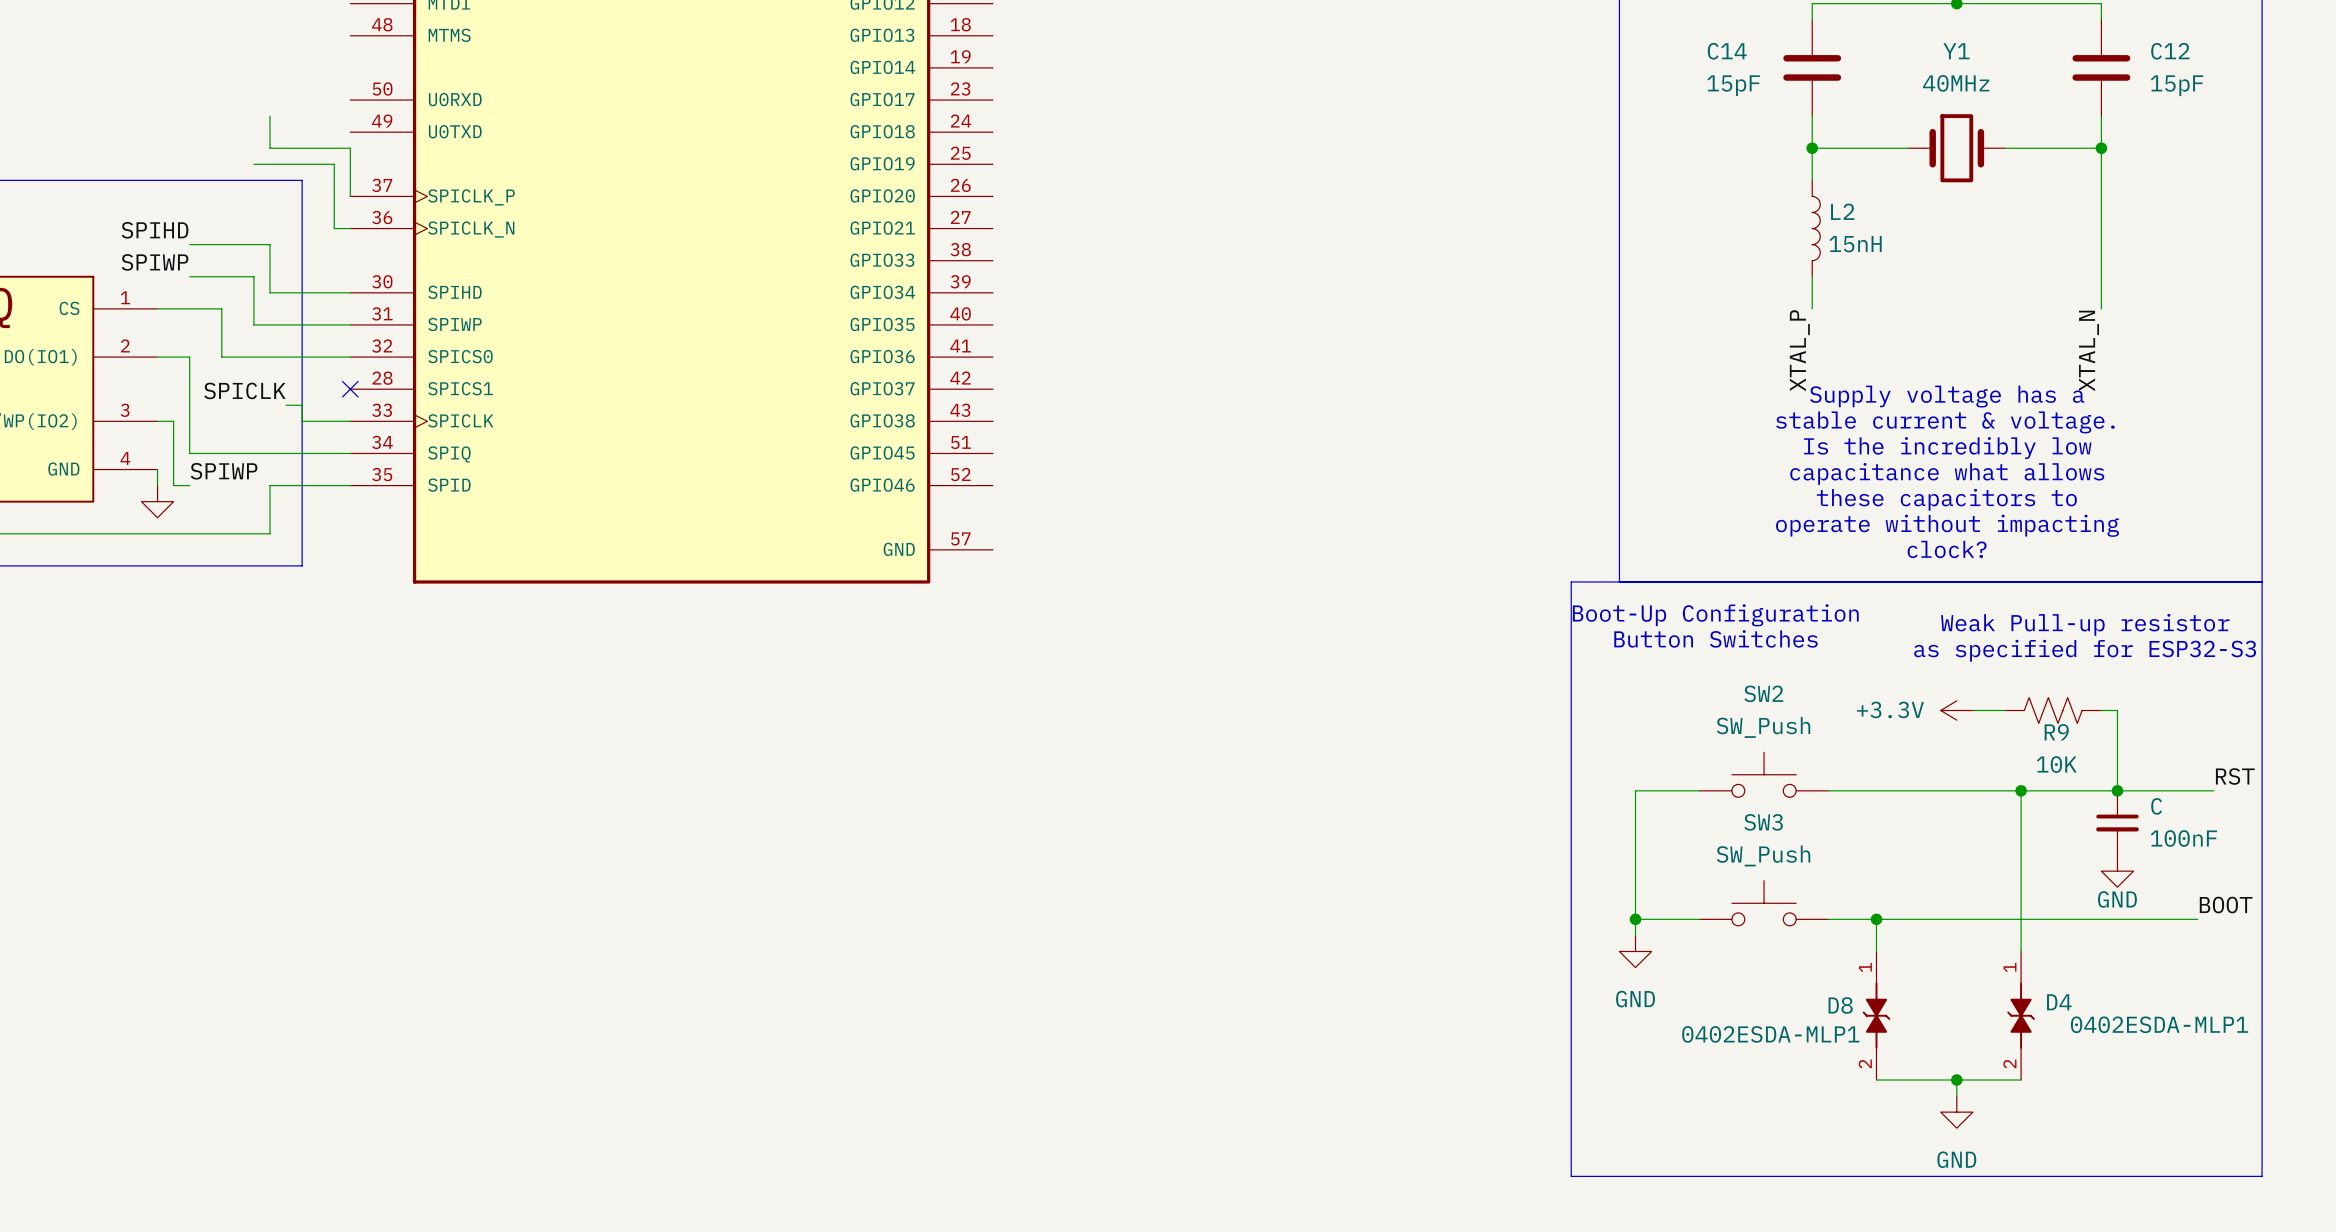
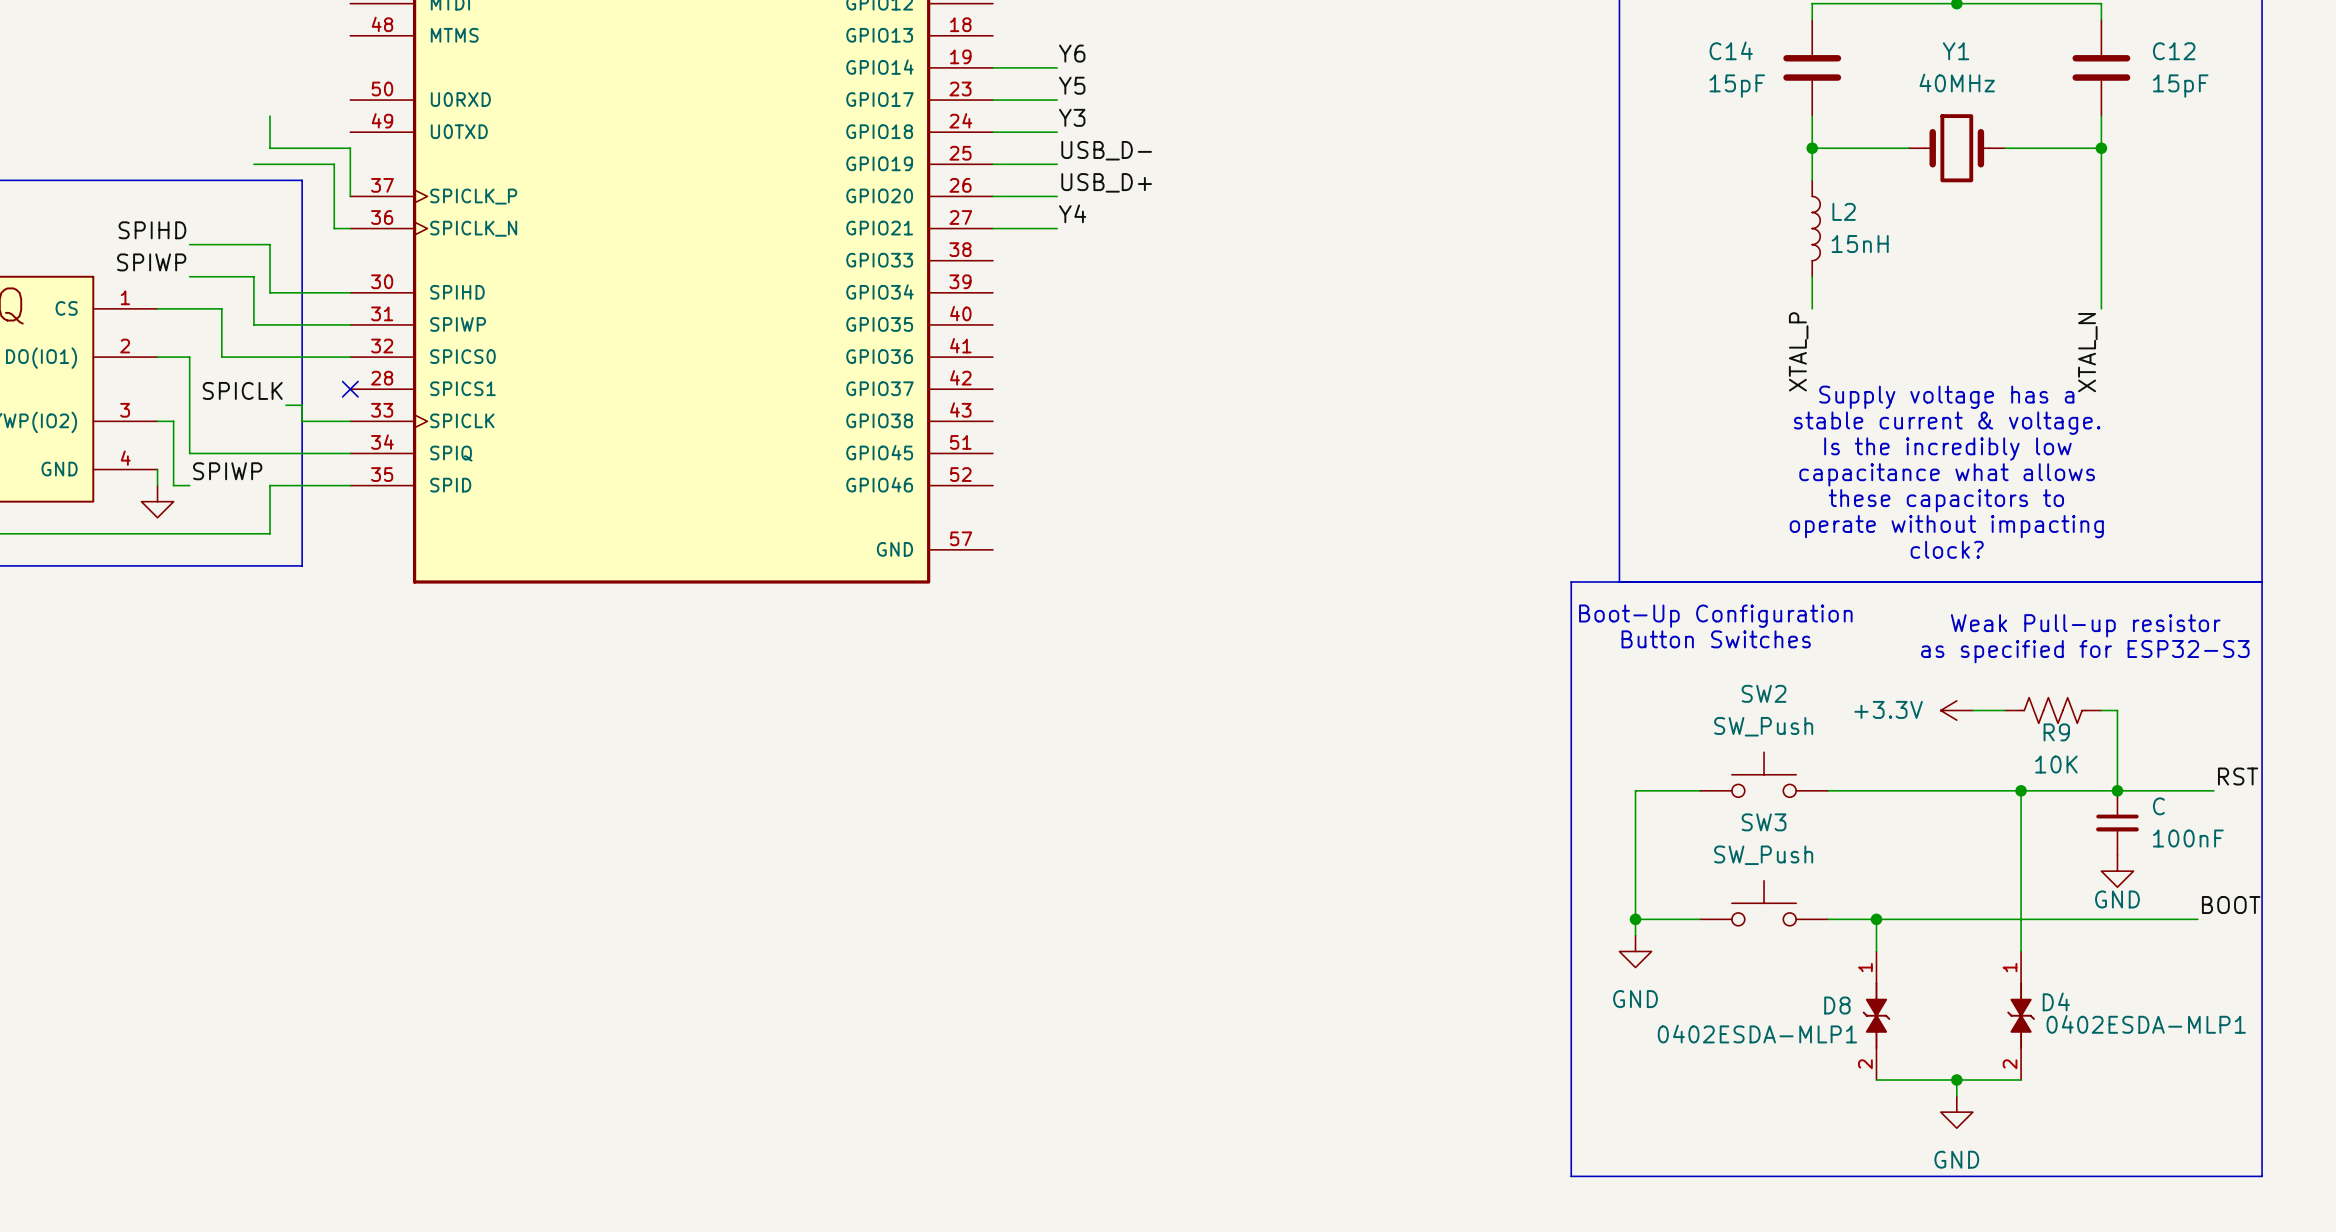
label: none -> Y6 (1072, 53)
wire: none -> (992, 67) (1057, 67)
label: none -> Y5 (1072, 85)
wire: none -> (992, 100) (1057, 100)
label: none -> Y3 (1072, 117)
wire: none -> (992, 132) (1057, 132)
label: none -> USB_D- (1106, 150)
wire: none -> (992, 164) (1057, 164)
label: none -> USB_D+ (1106, 182)
wire: none -> (992, 196) (1057, 196)
label: none -> Y4 (1072, 213)
wire: none -> (992, 228) (1057, 228)

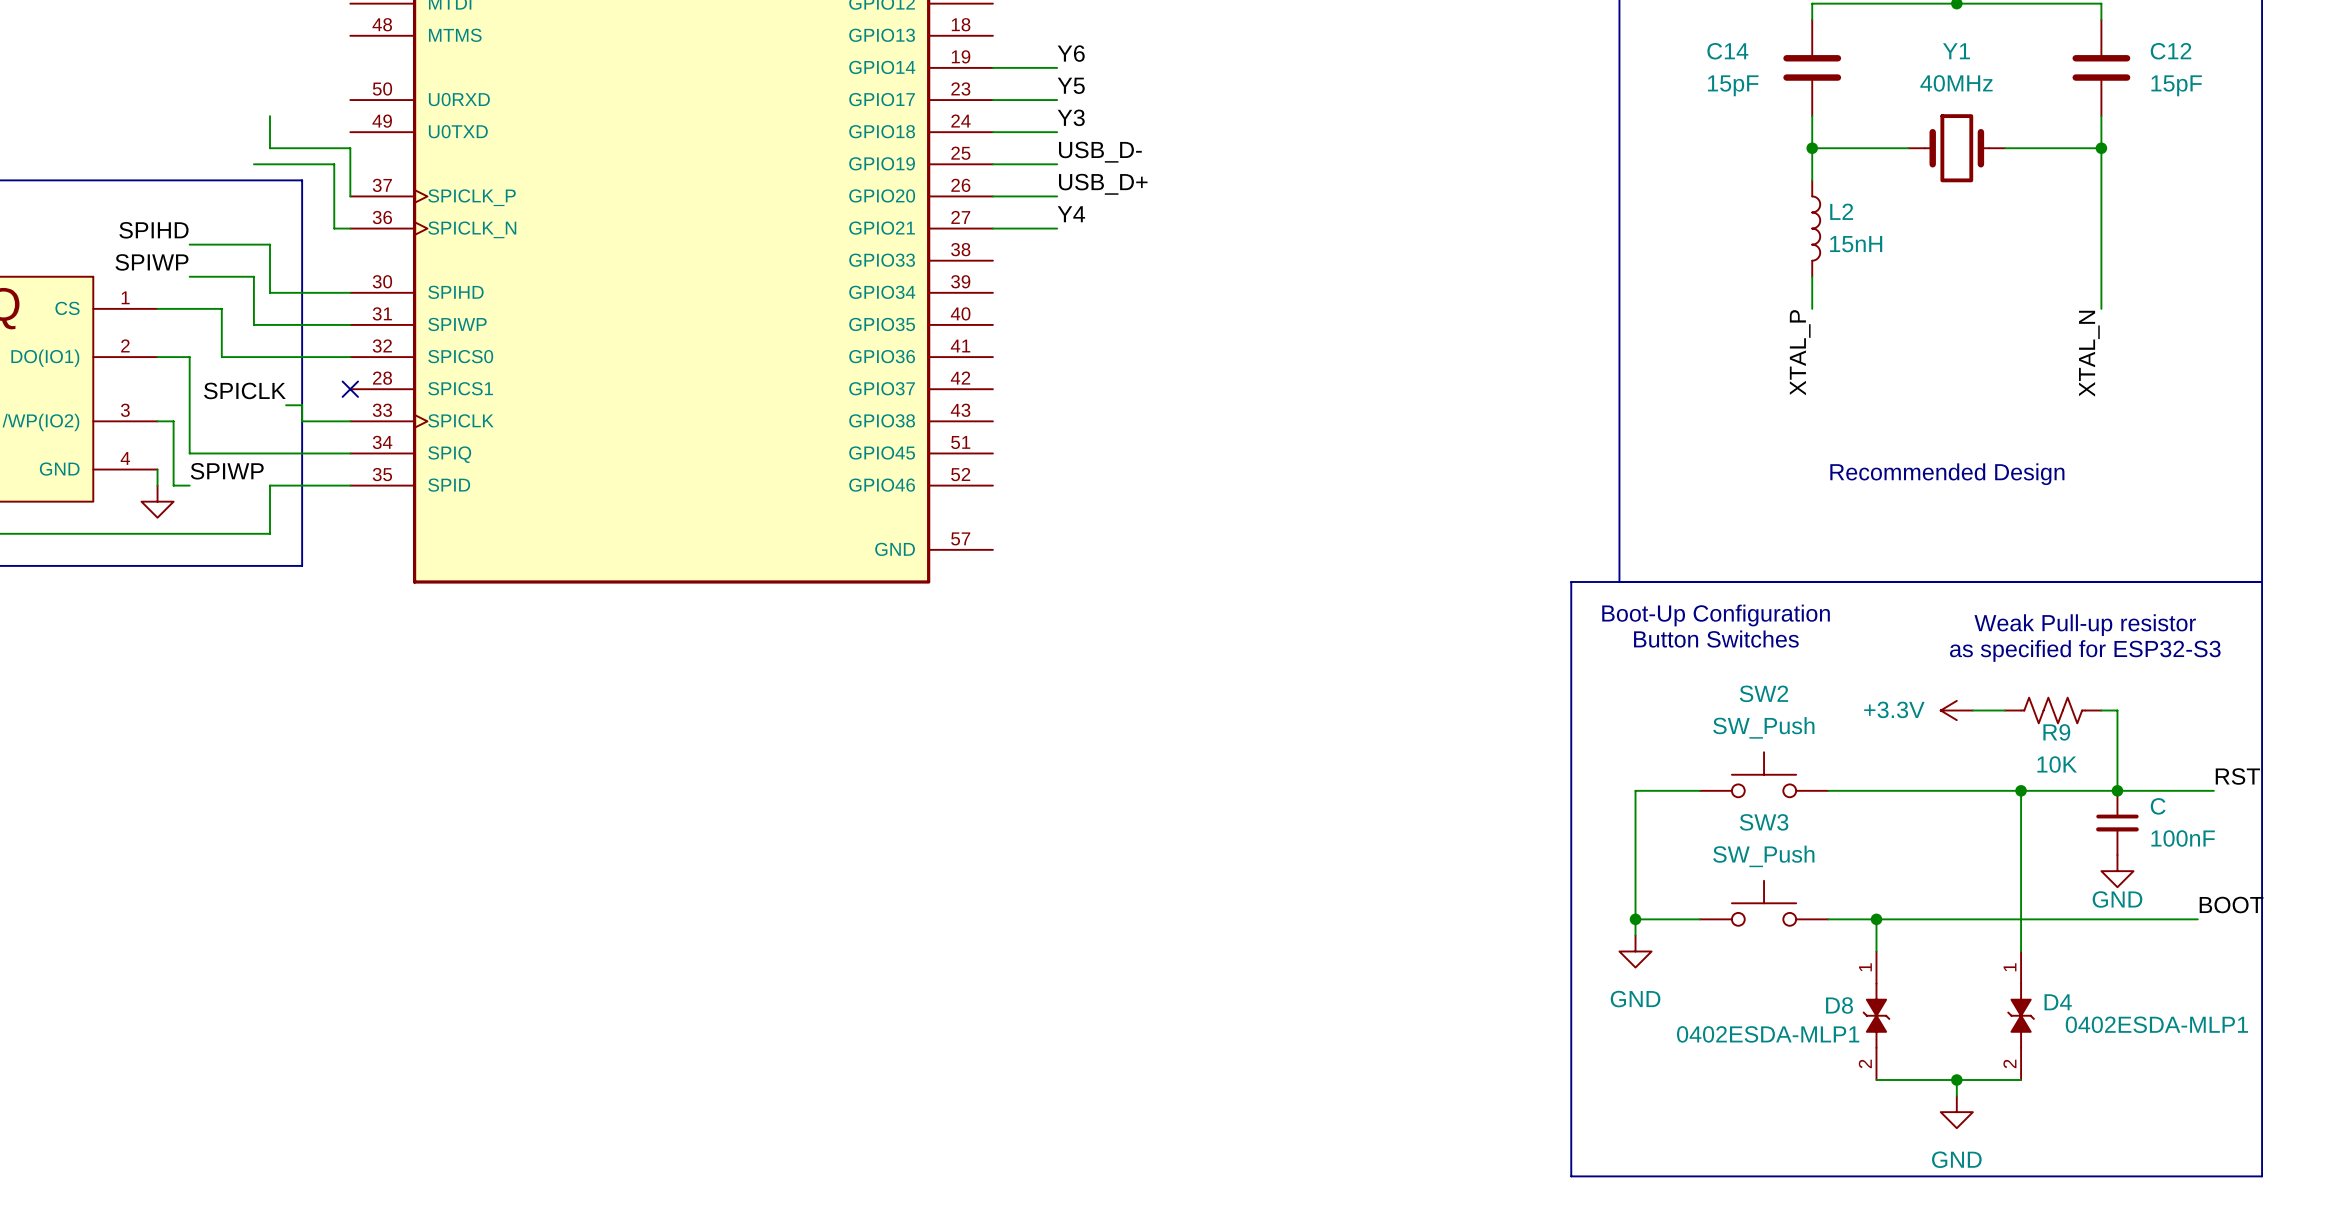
text: Supply voltage has a (1946, 397) -> none
text: stable current & voltage. (1947, 423) -> none
text: Is the incredibly low (1947, 449) -> none
text: capacitance what allows (1947, 474) -> Recommended Design (1947, 474)
text: these capacitors to (1946, 500) -> none
text: operate without impacting (1946, 526) -> none
text: clock? (1947, 549) -> none

